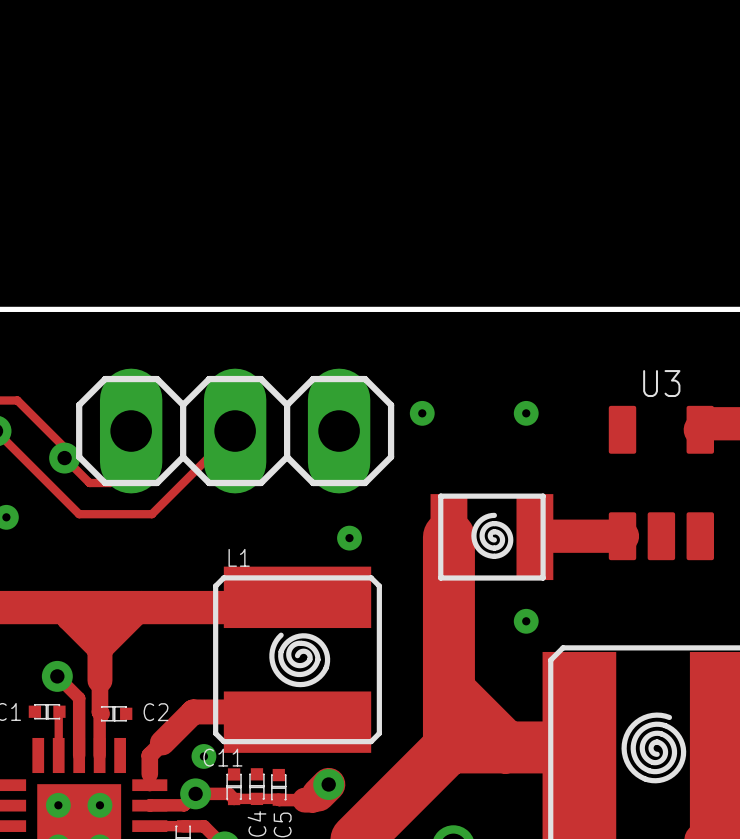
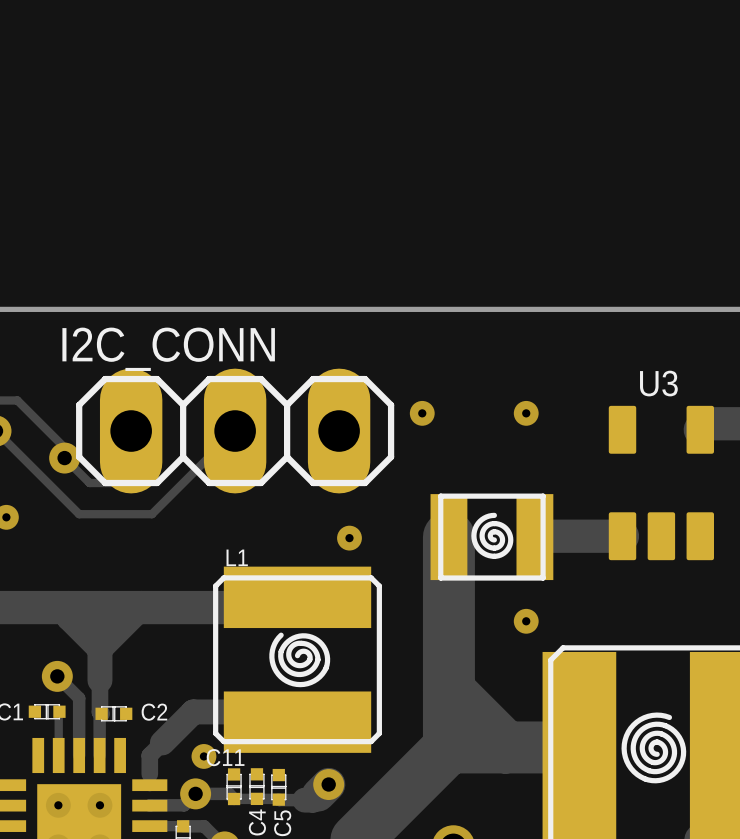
text: none -> I2C_CONN (168, 349)

